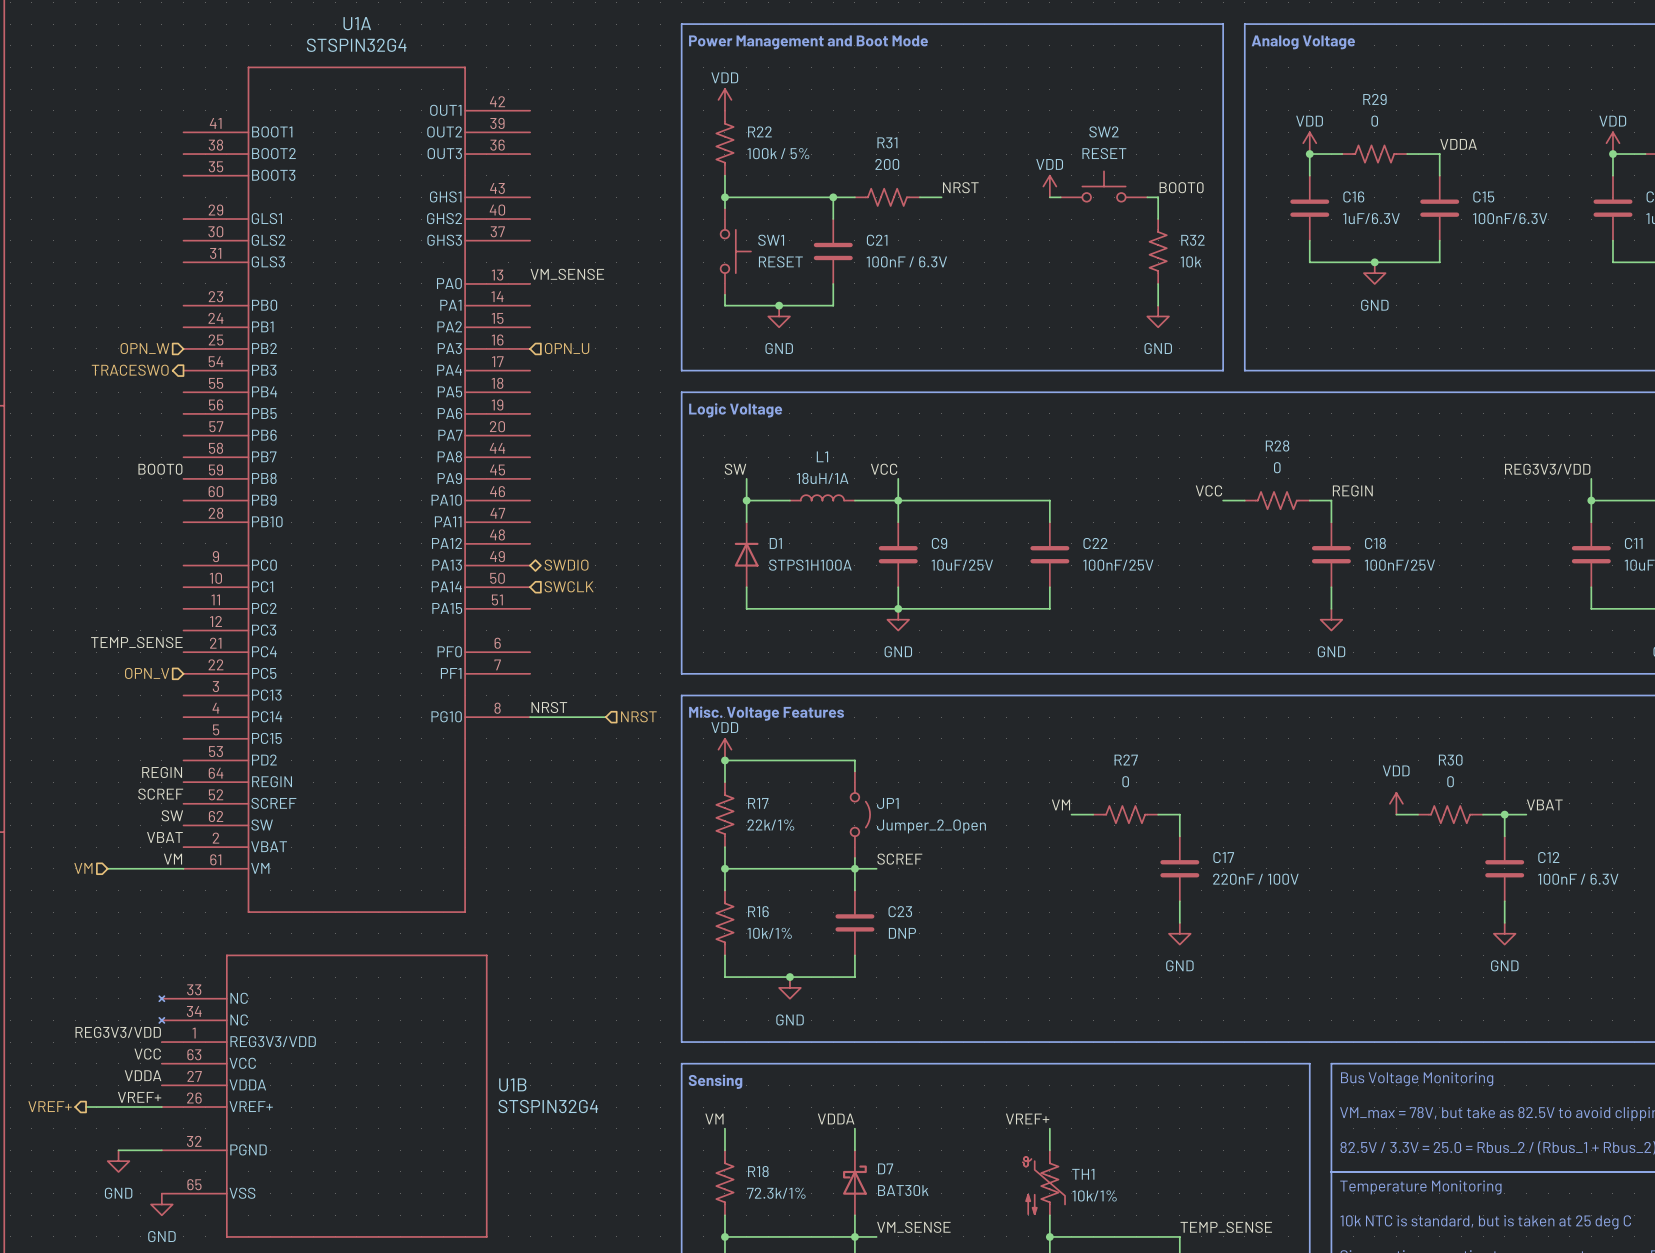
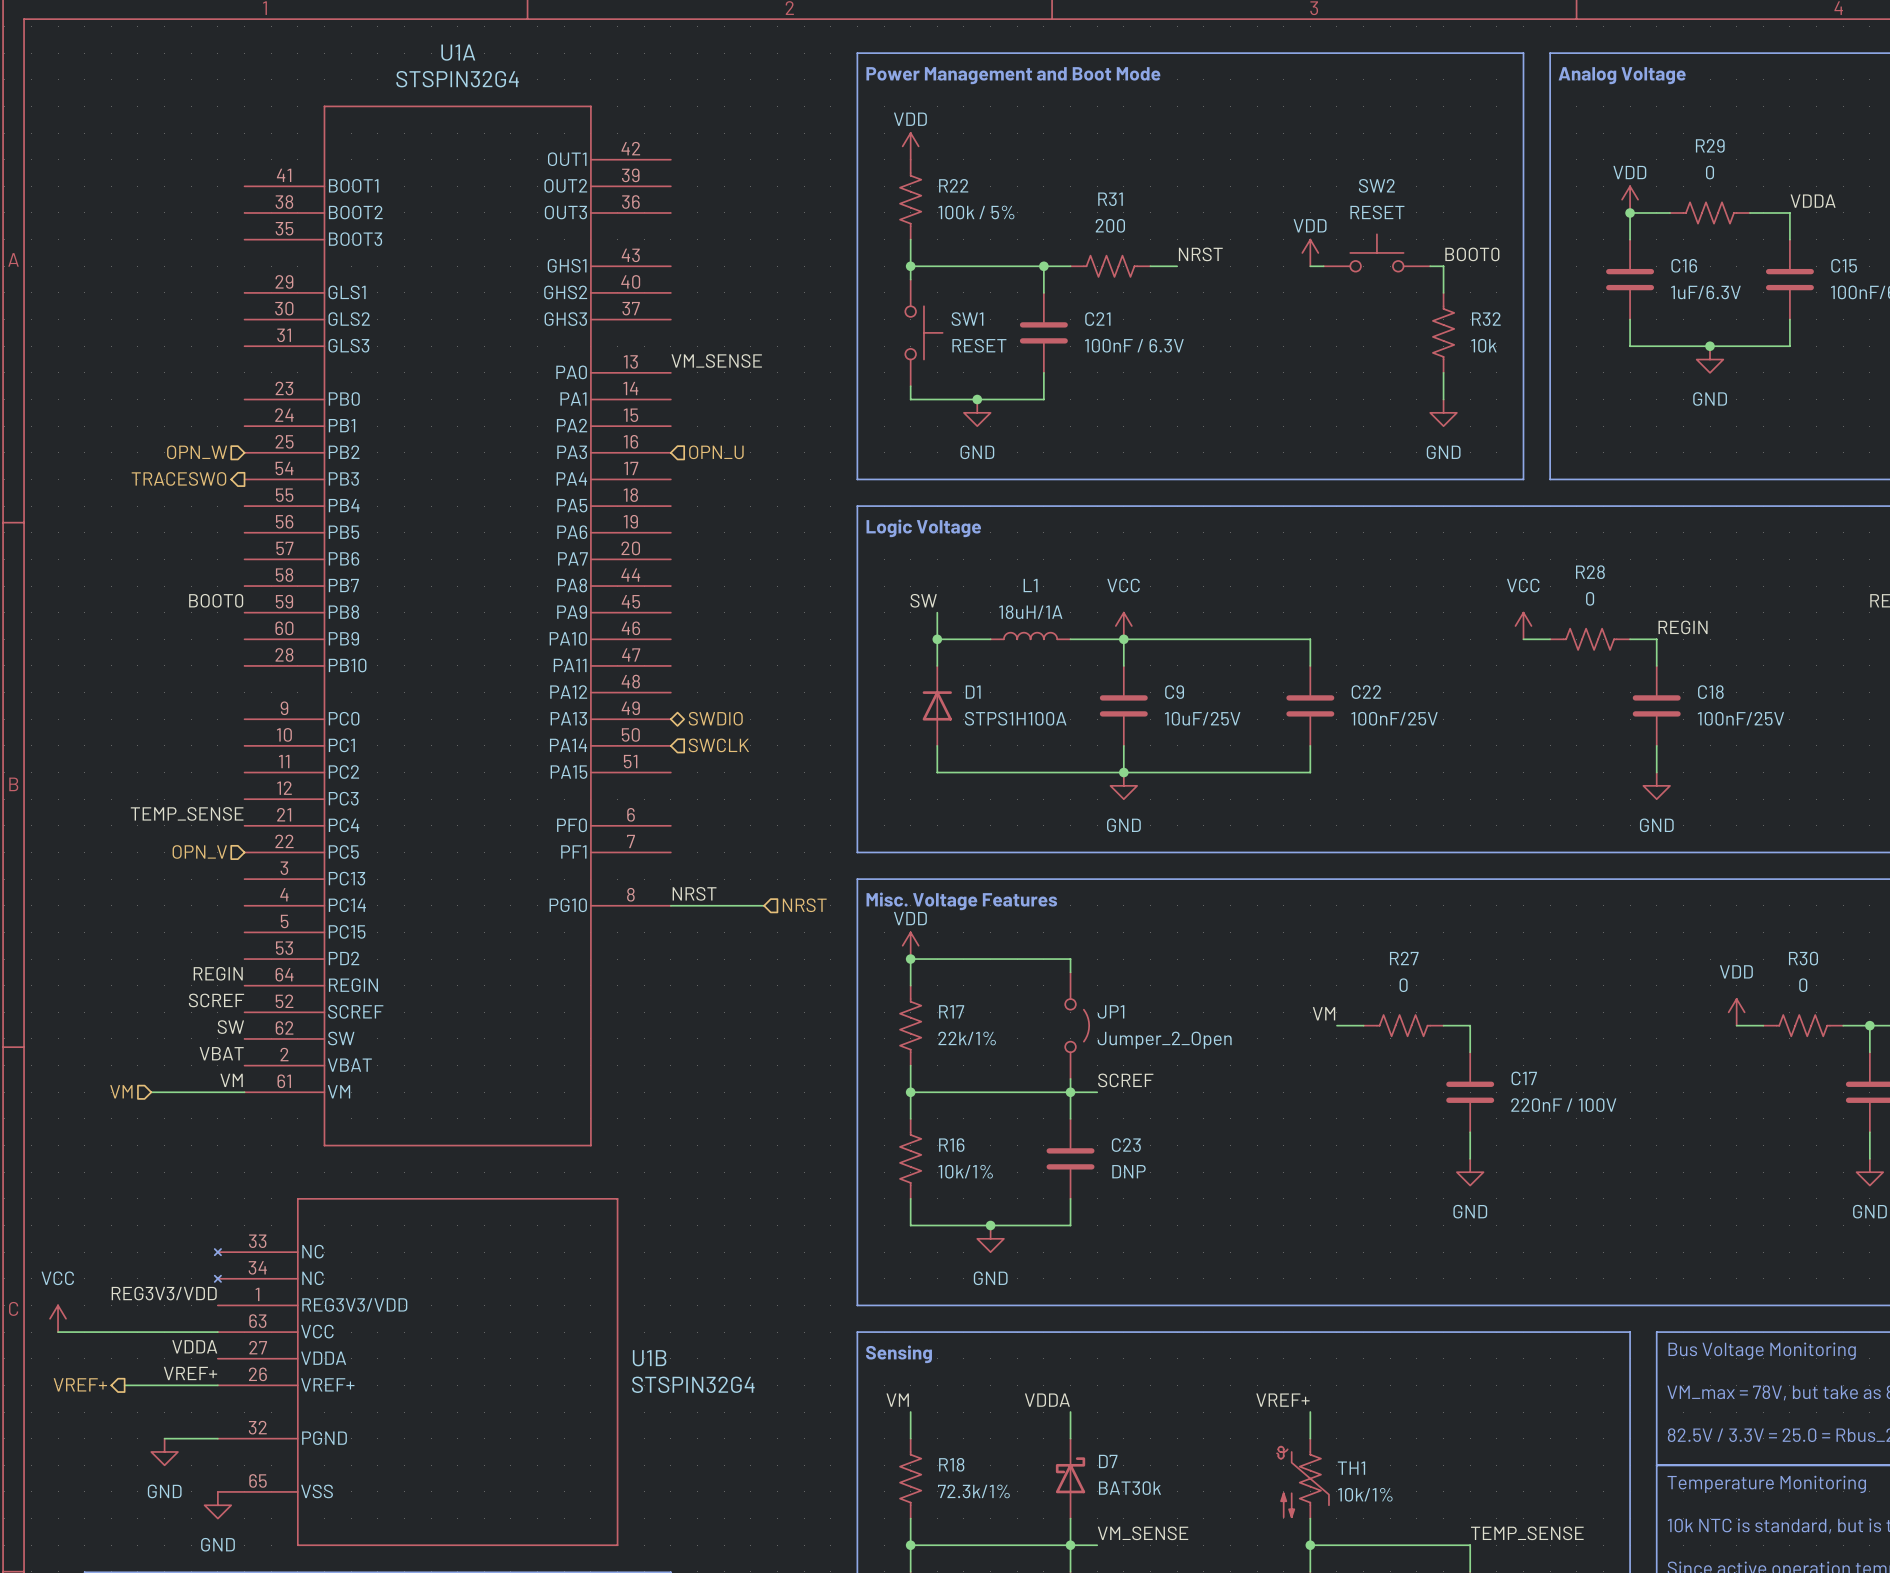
label: VCC (884, 469) -> none
power symbol: none -> VCC (1123, 625)
power symbol: none -> VCC (1523, 625)
label: VCC (1208, 490) -> none
power symbol: none -> VCC (58, 1318)
label: VCC (147, 1054) -> none
wire: none -> (58, 1332) (217, 1332)

